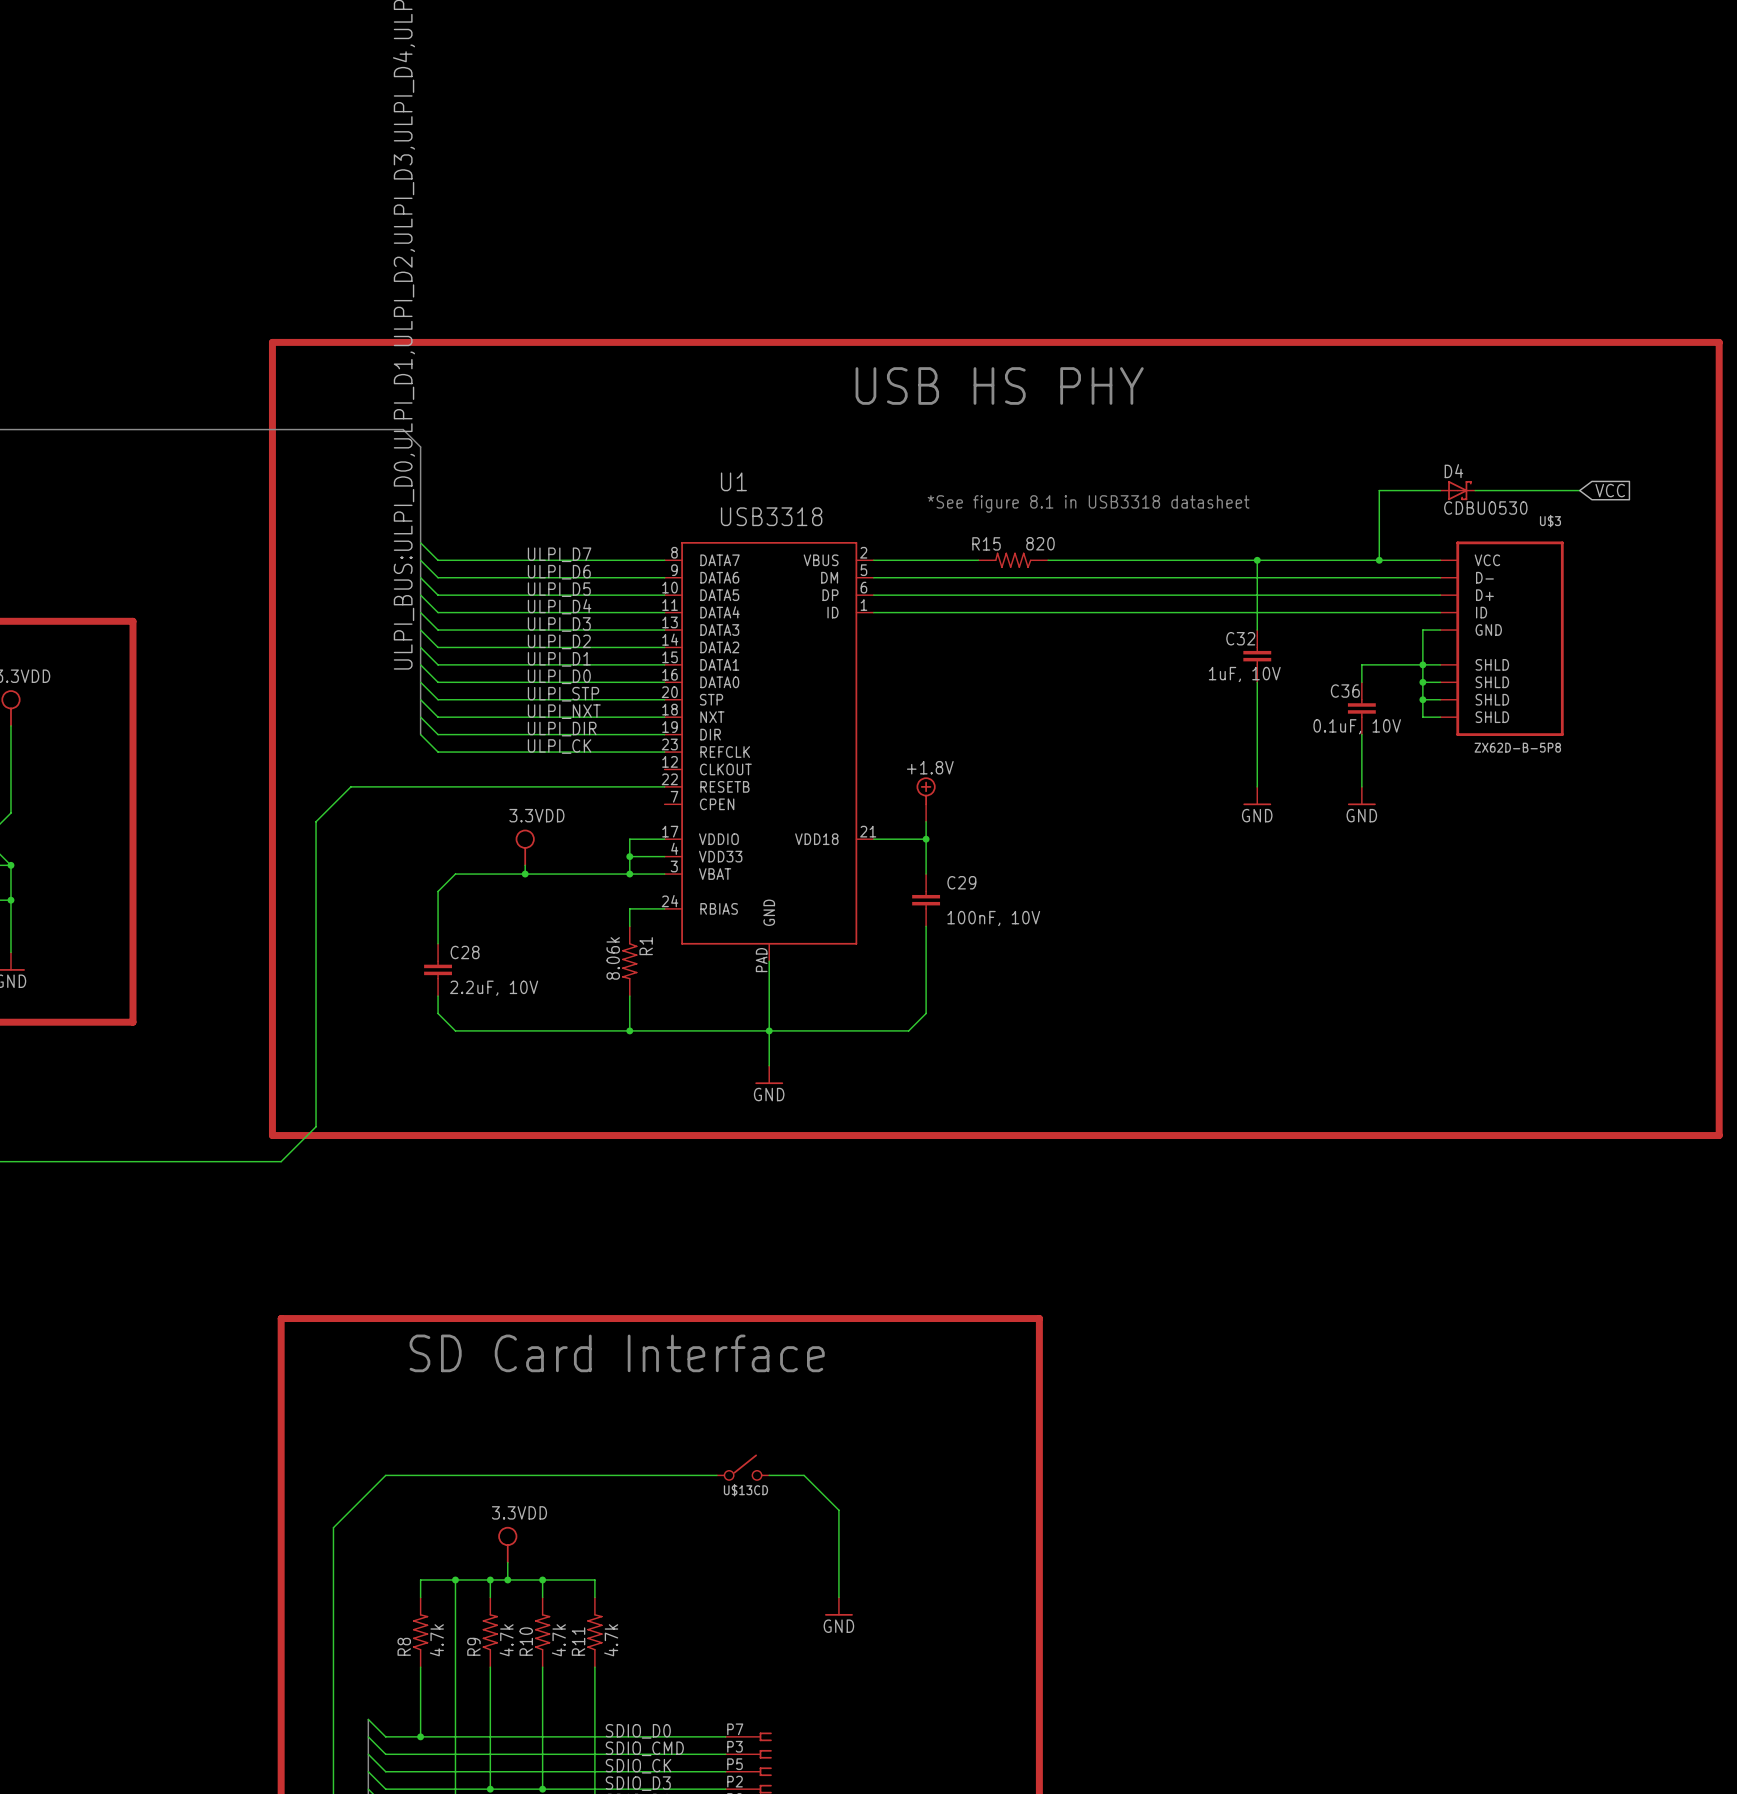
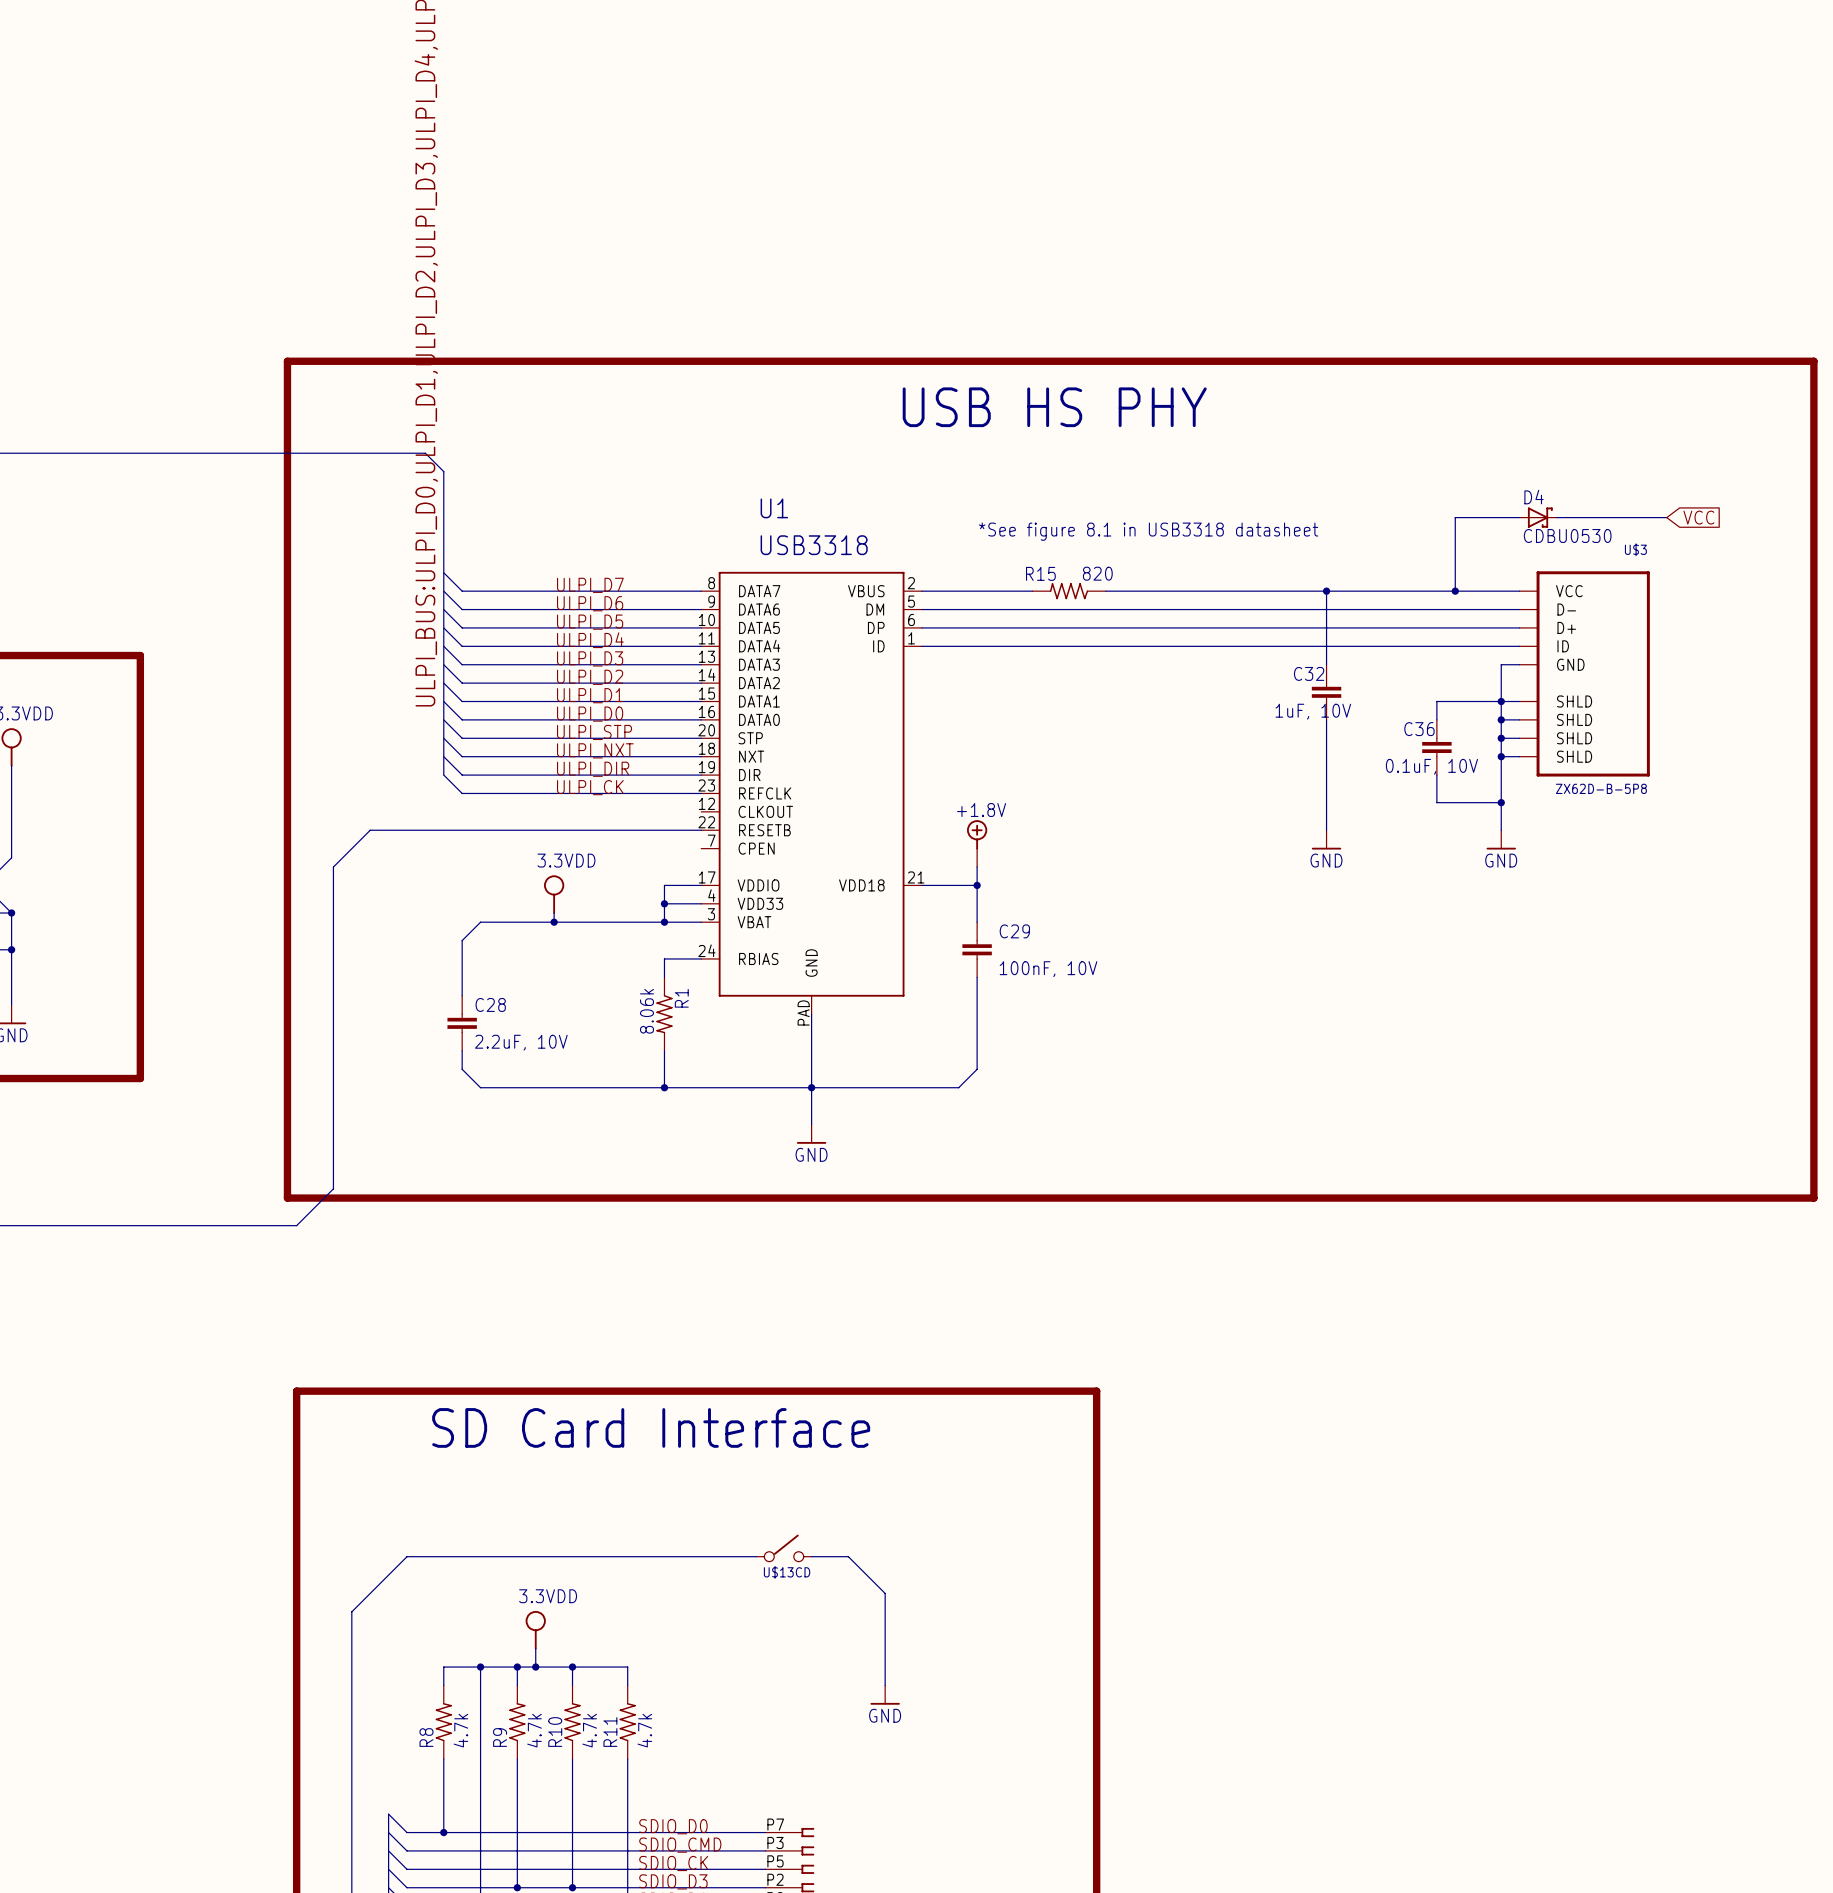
wire: none -> (1501, 756) (1501, 830)
junction: none -> (1501, 756)
wire: (1361, 760) (1361, 786) -> (1436, 802) (1501, 802)
junction: none -> (1501, 802)
power symbol position: GND (1361, 796) -> GND (1501, 839)

